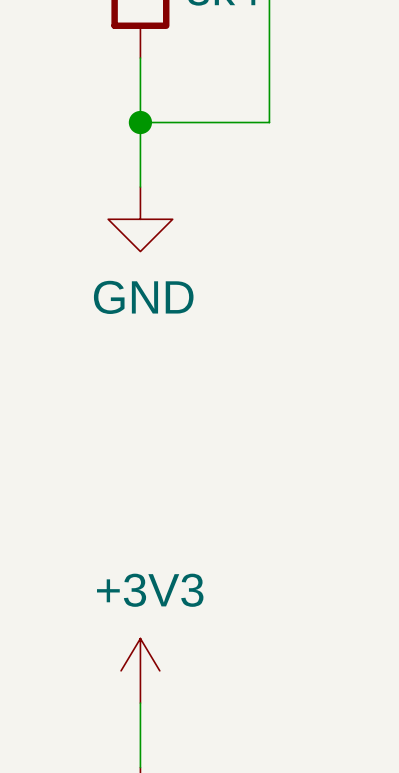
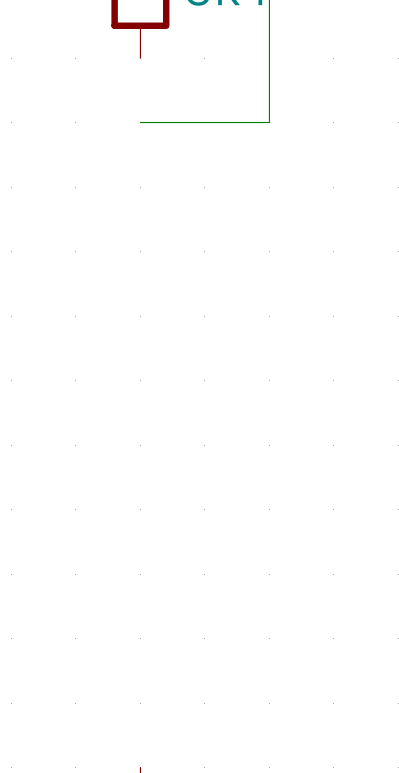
wire: (140, 58) (140, 187) -> none
junction: (140, 122) -> none
power symbol: GND (140, 219) -> none
power symbol: +3V3 (140, 670) -> none
wire: (140, 703) (140, 767) -> none

